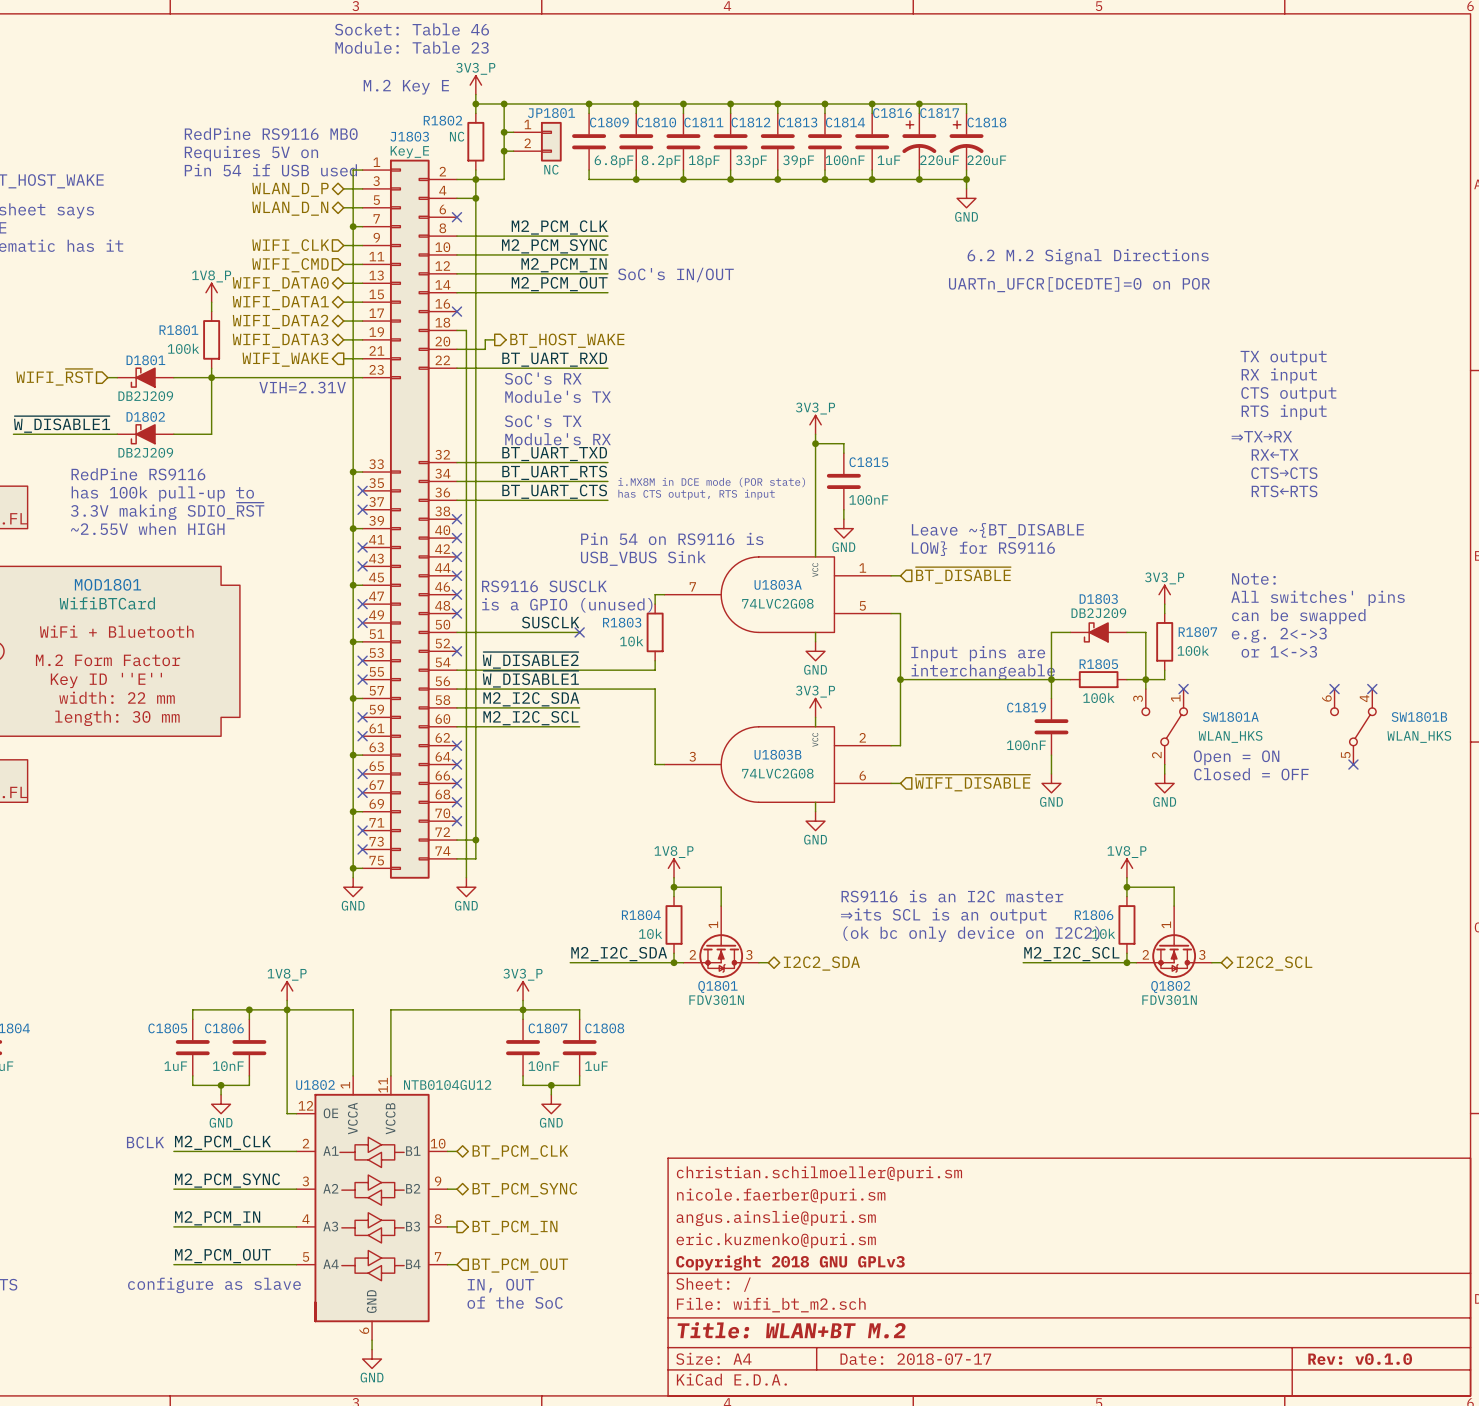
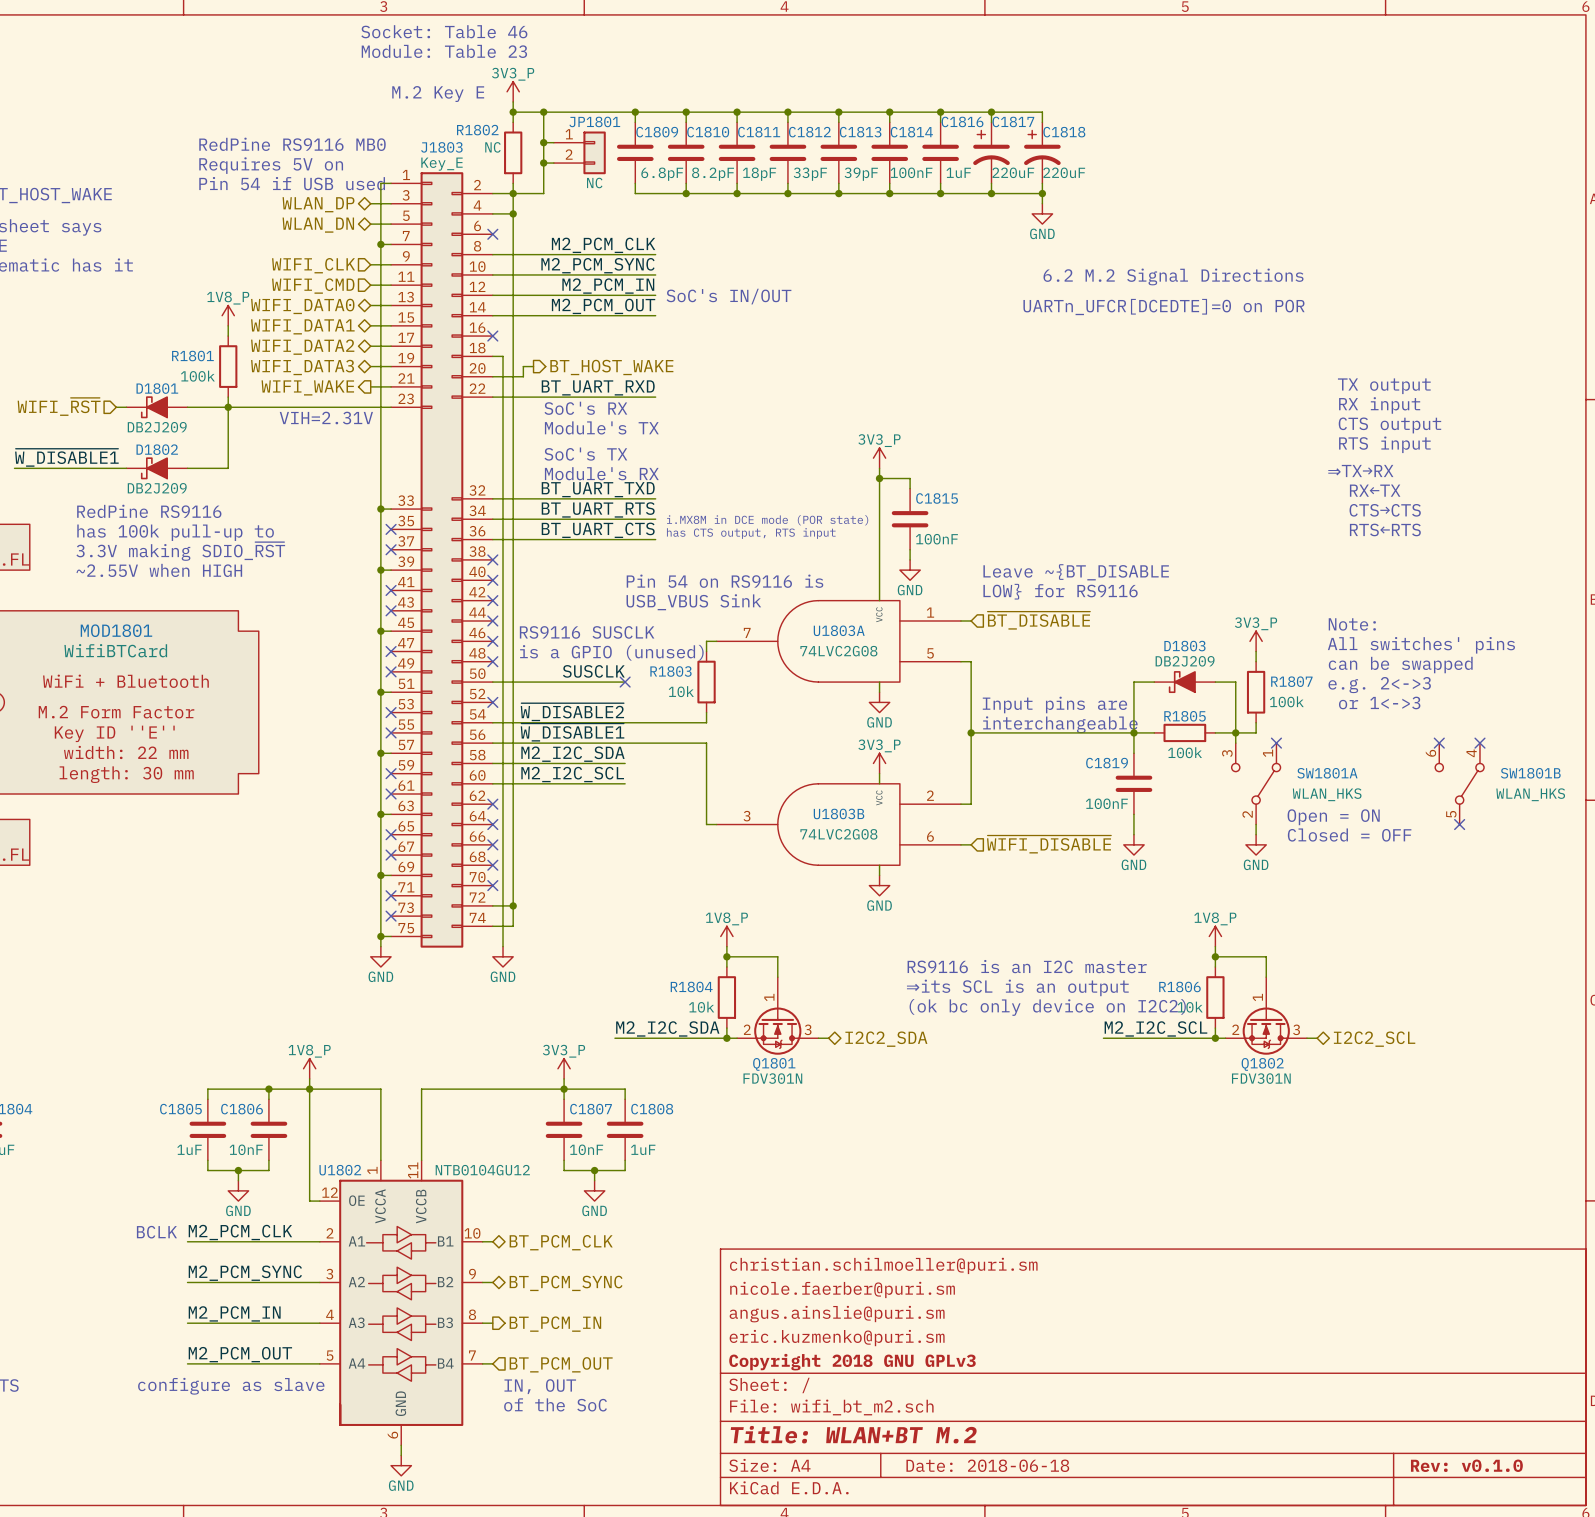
hierarchical label: WLAN_D_P (290, 189) -> WLAN_DP (318, 204)
hierarchical label: WLAN_D_N (290, 208) -> WLAN_DN (318, 225)
title block: Date: 2018-07-17 (915, 1359) -> Date: 2018-06-18 (987, 1465)

